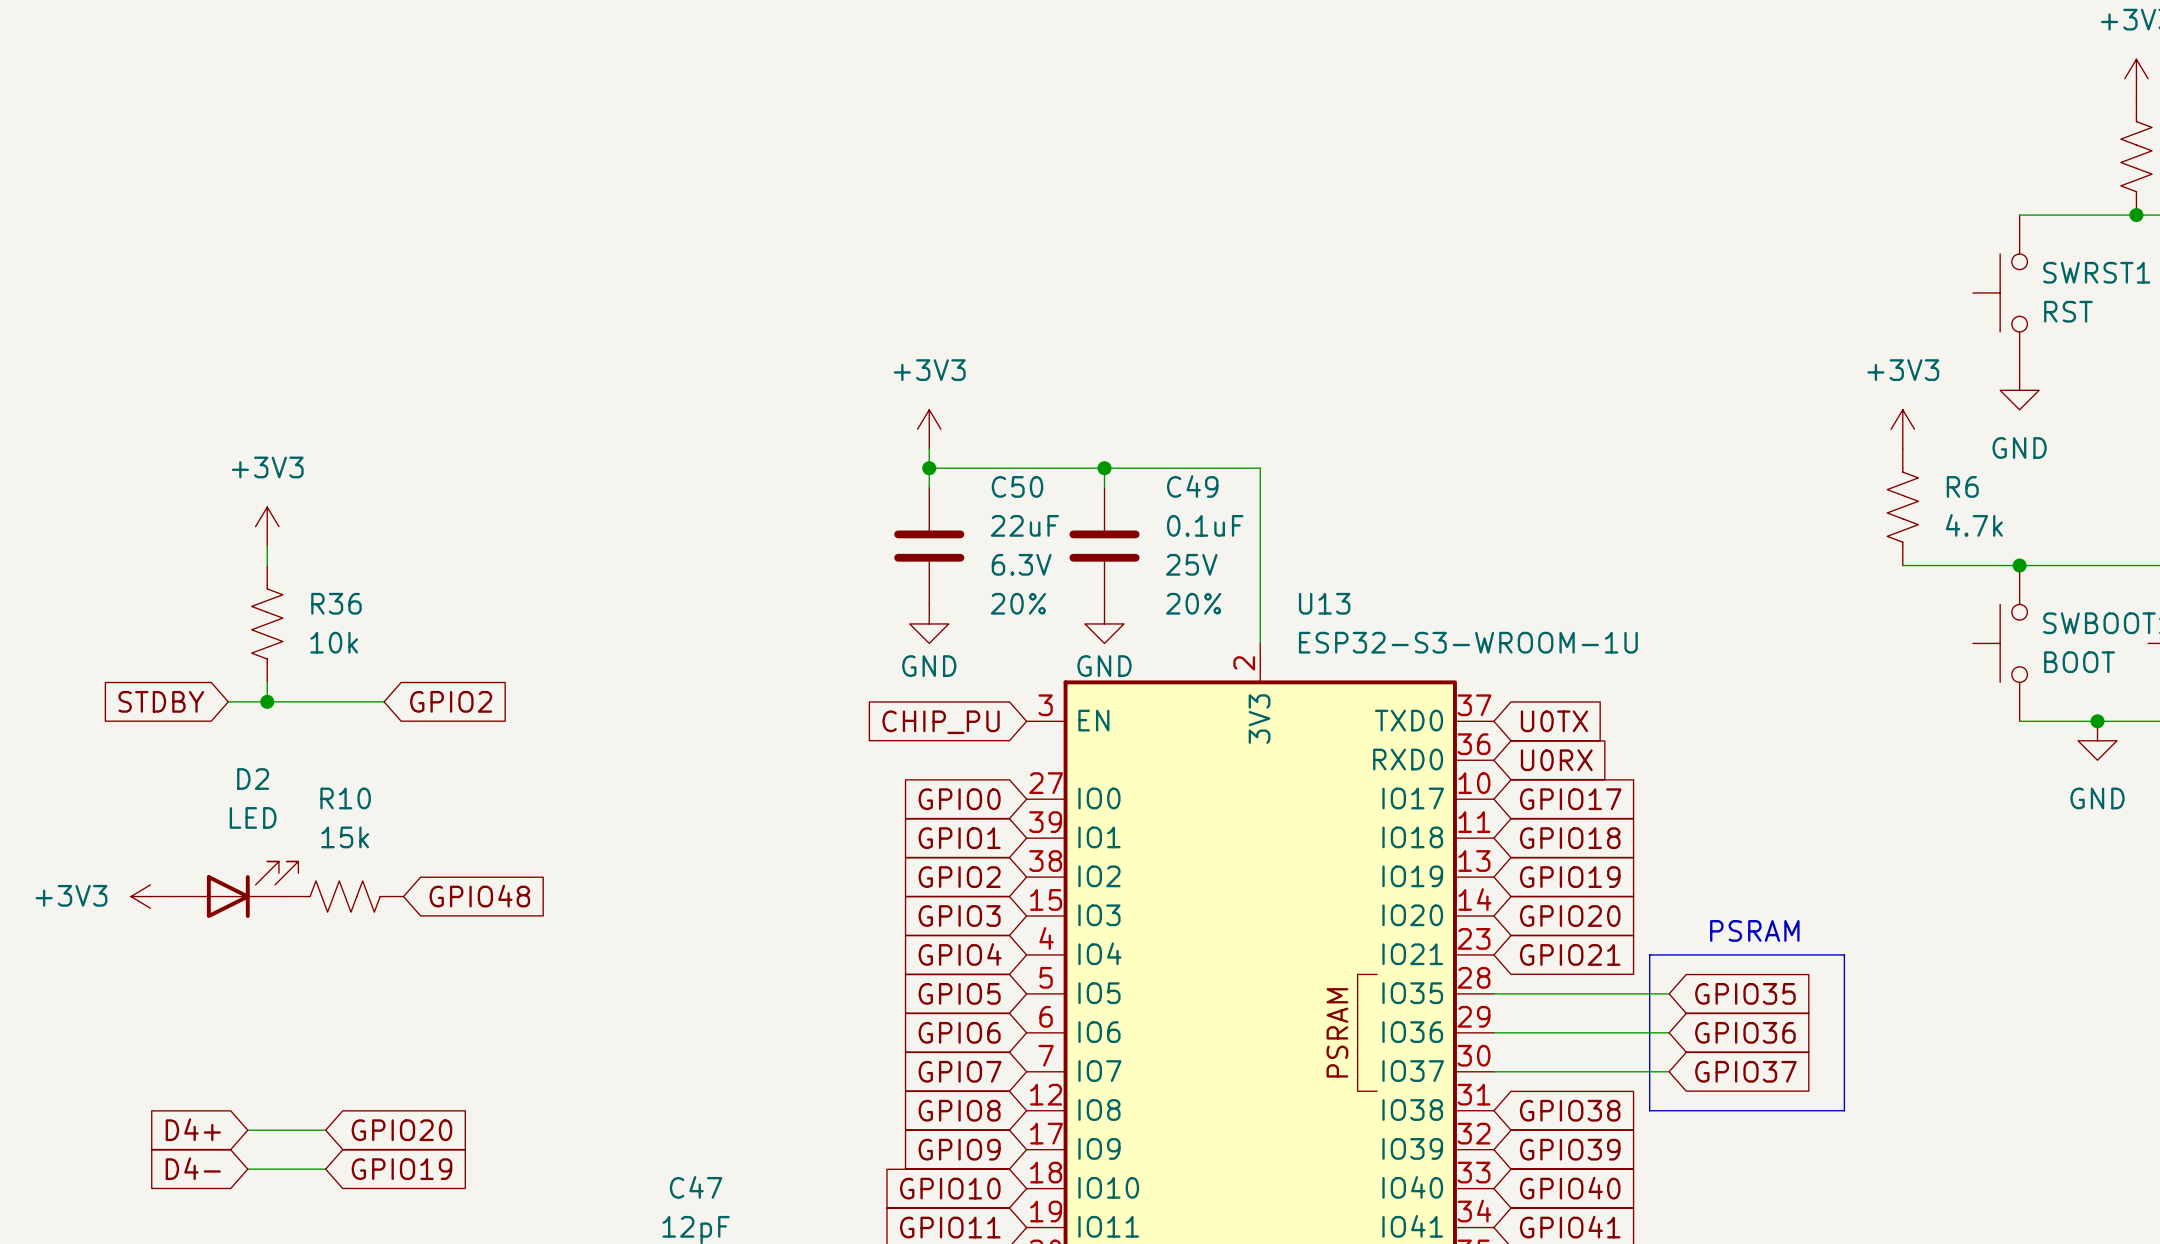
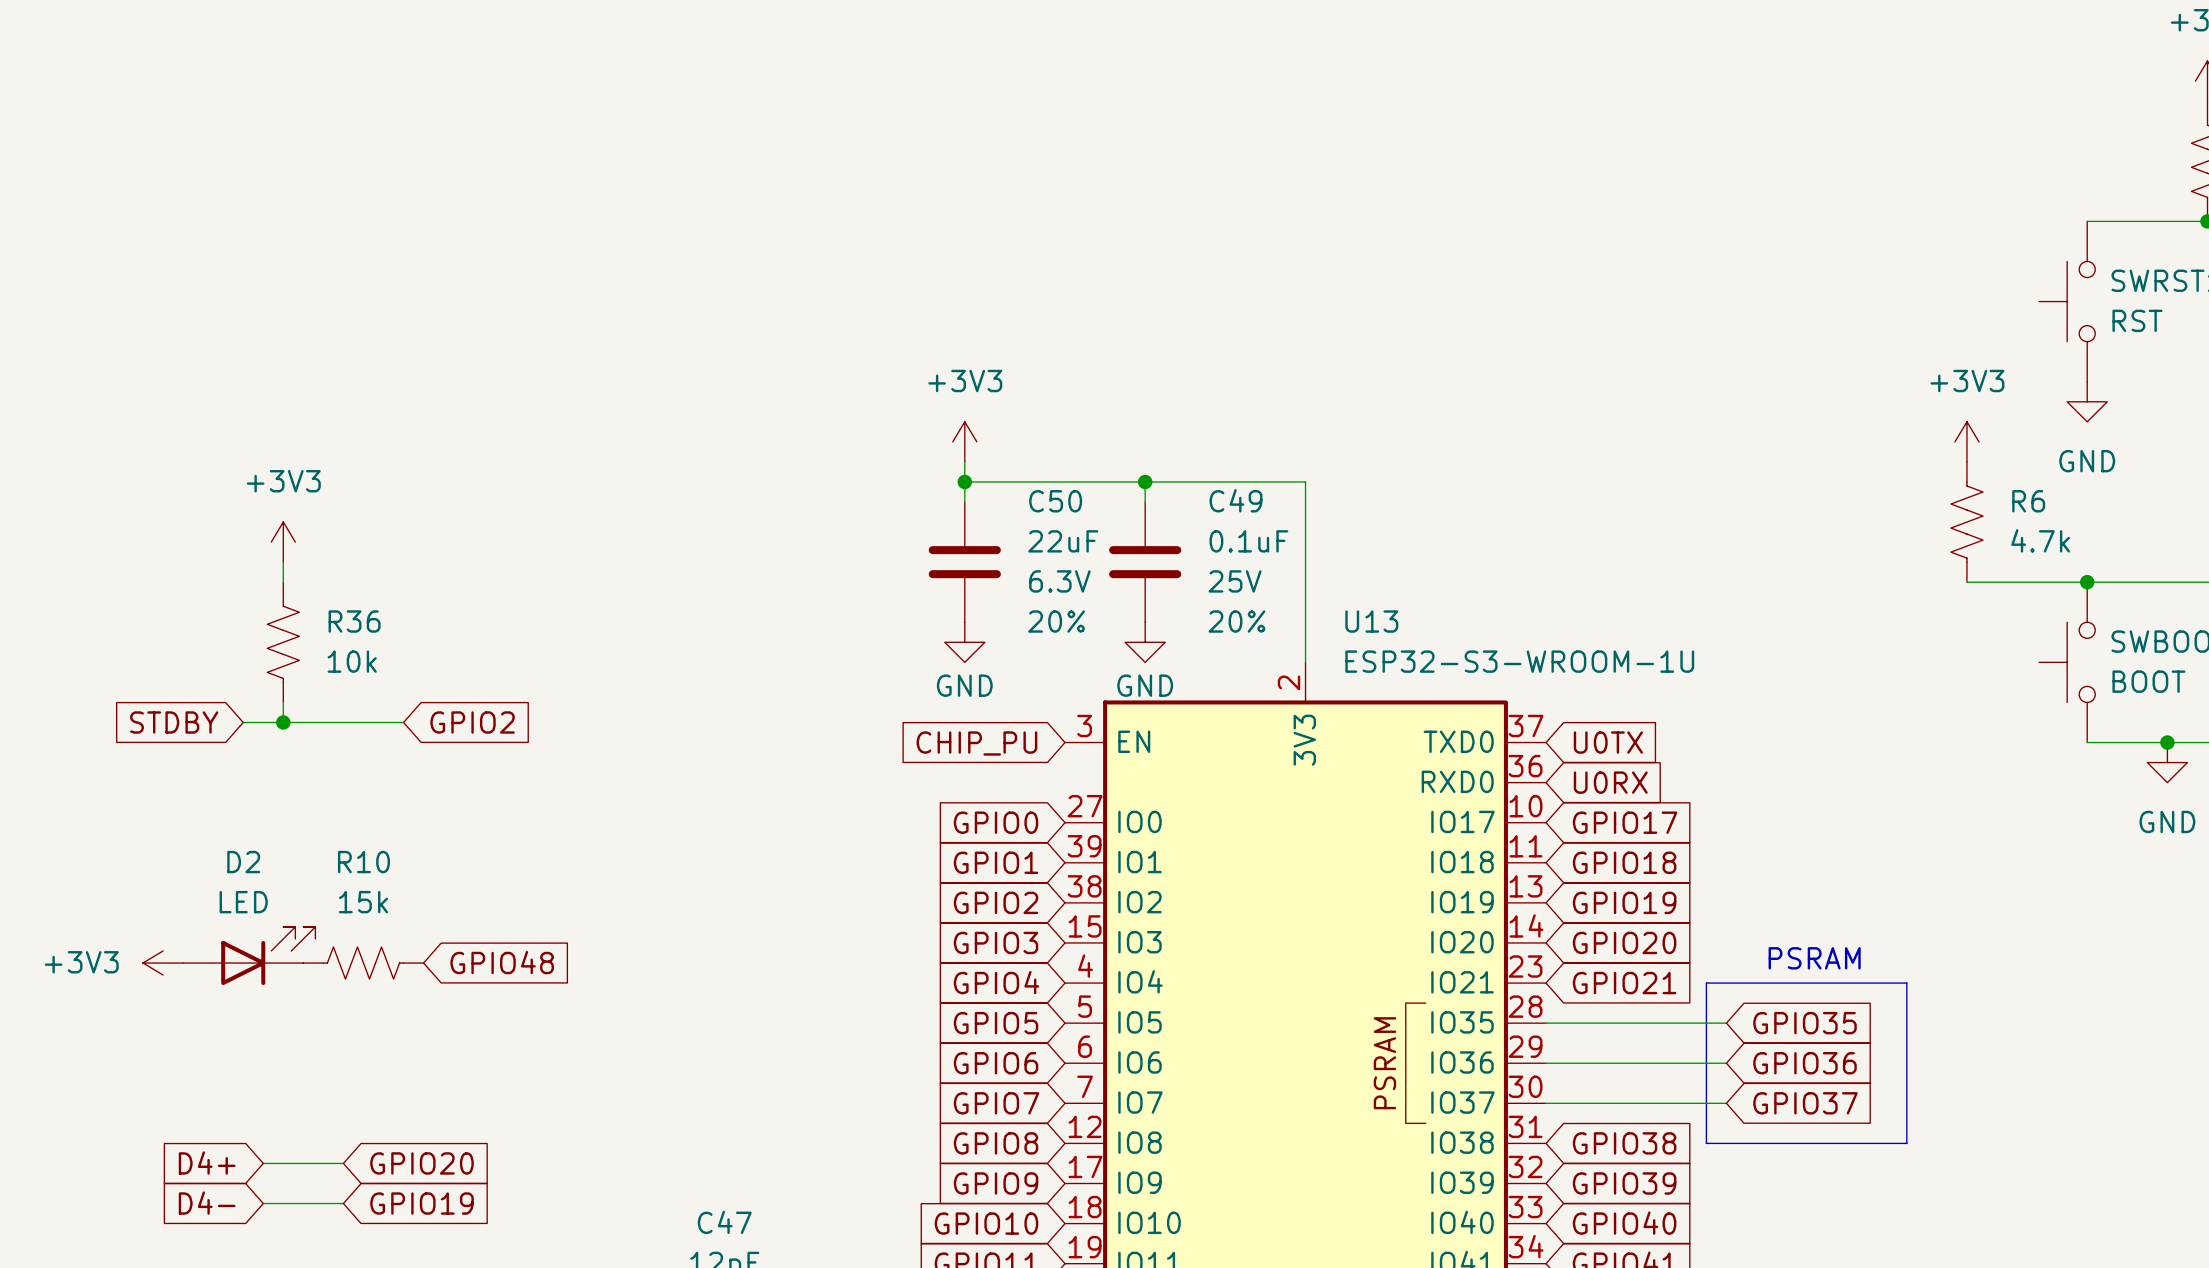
D2 name position: D2 (253, 779) -> D2 (243, 862)
D2 value position: LED (253, 817) -> LED (243, 902)
D2 position: (234, 889) -> (249, 956)
power symbol position: +3V3 (150, 896) -> +3V3 (163, 963)
R10 position: (345, 896) -> (363, 963)
global label position: GPIO48 (479, 896) -> GPIO48 (502, 962)

